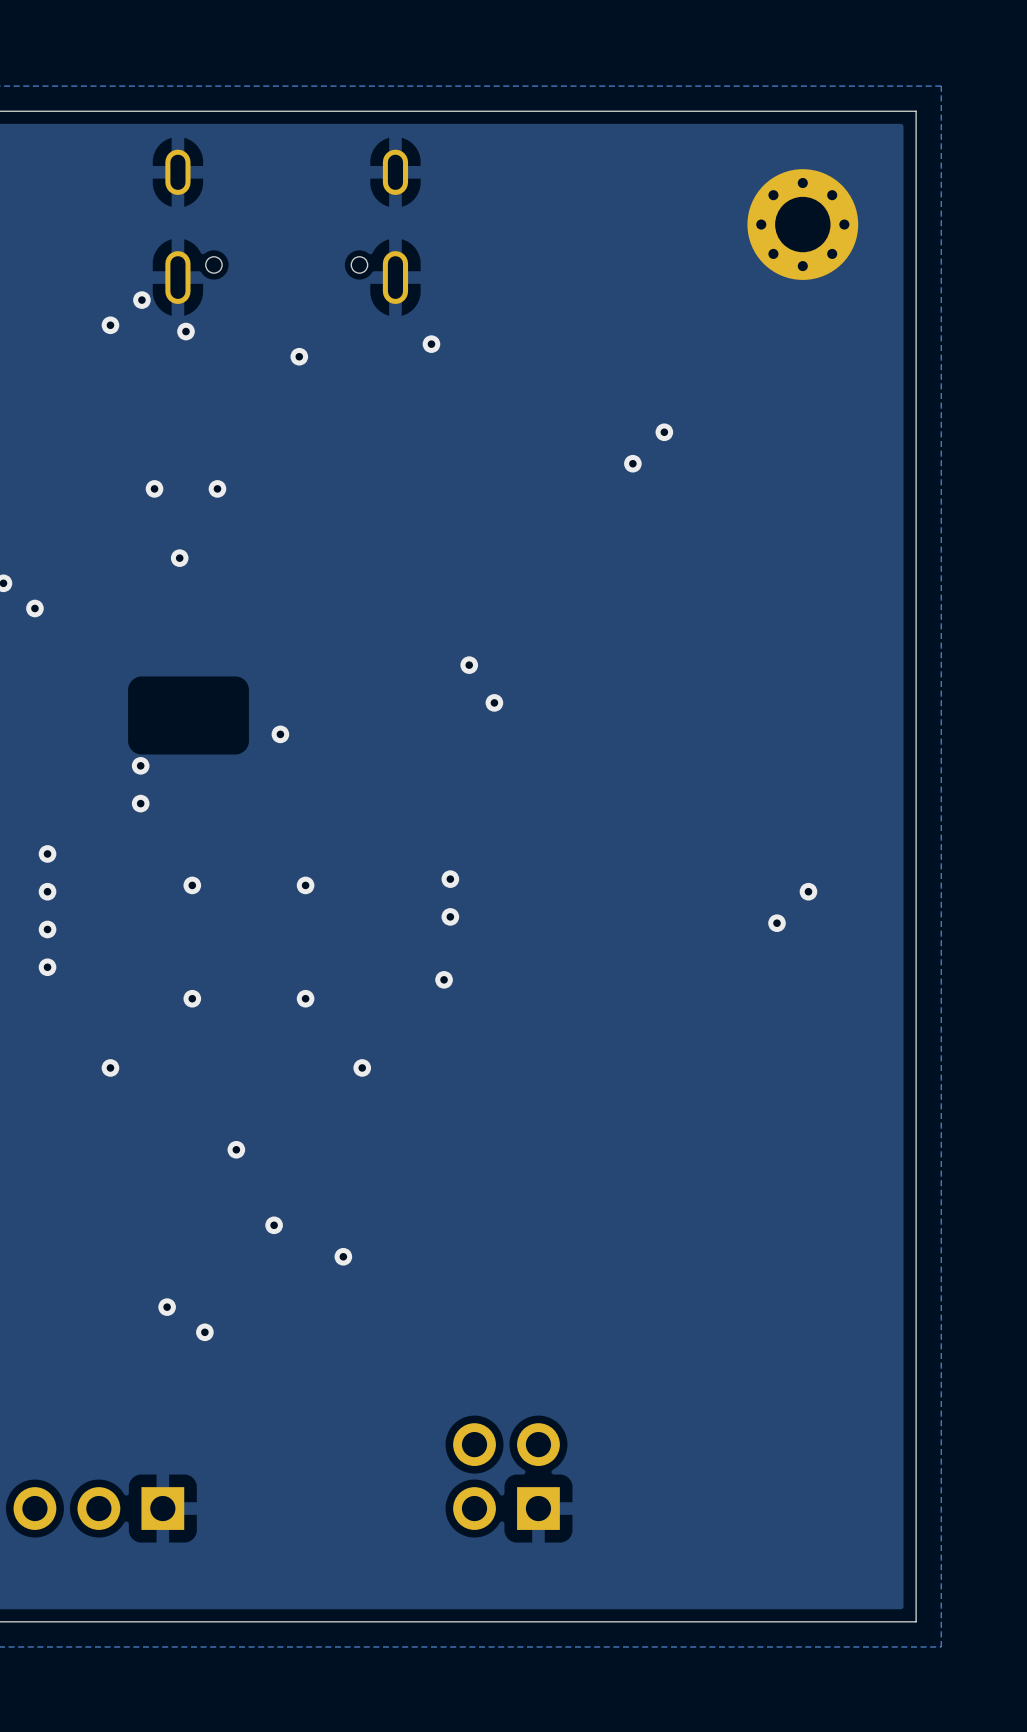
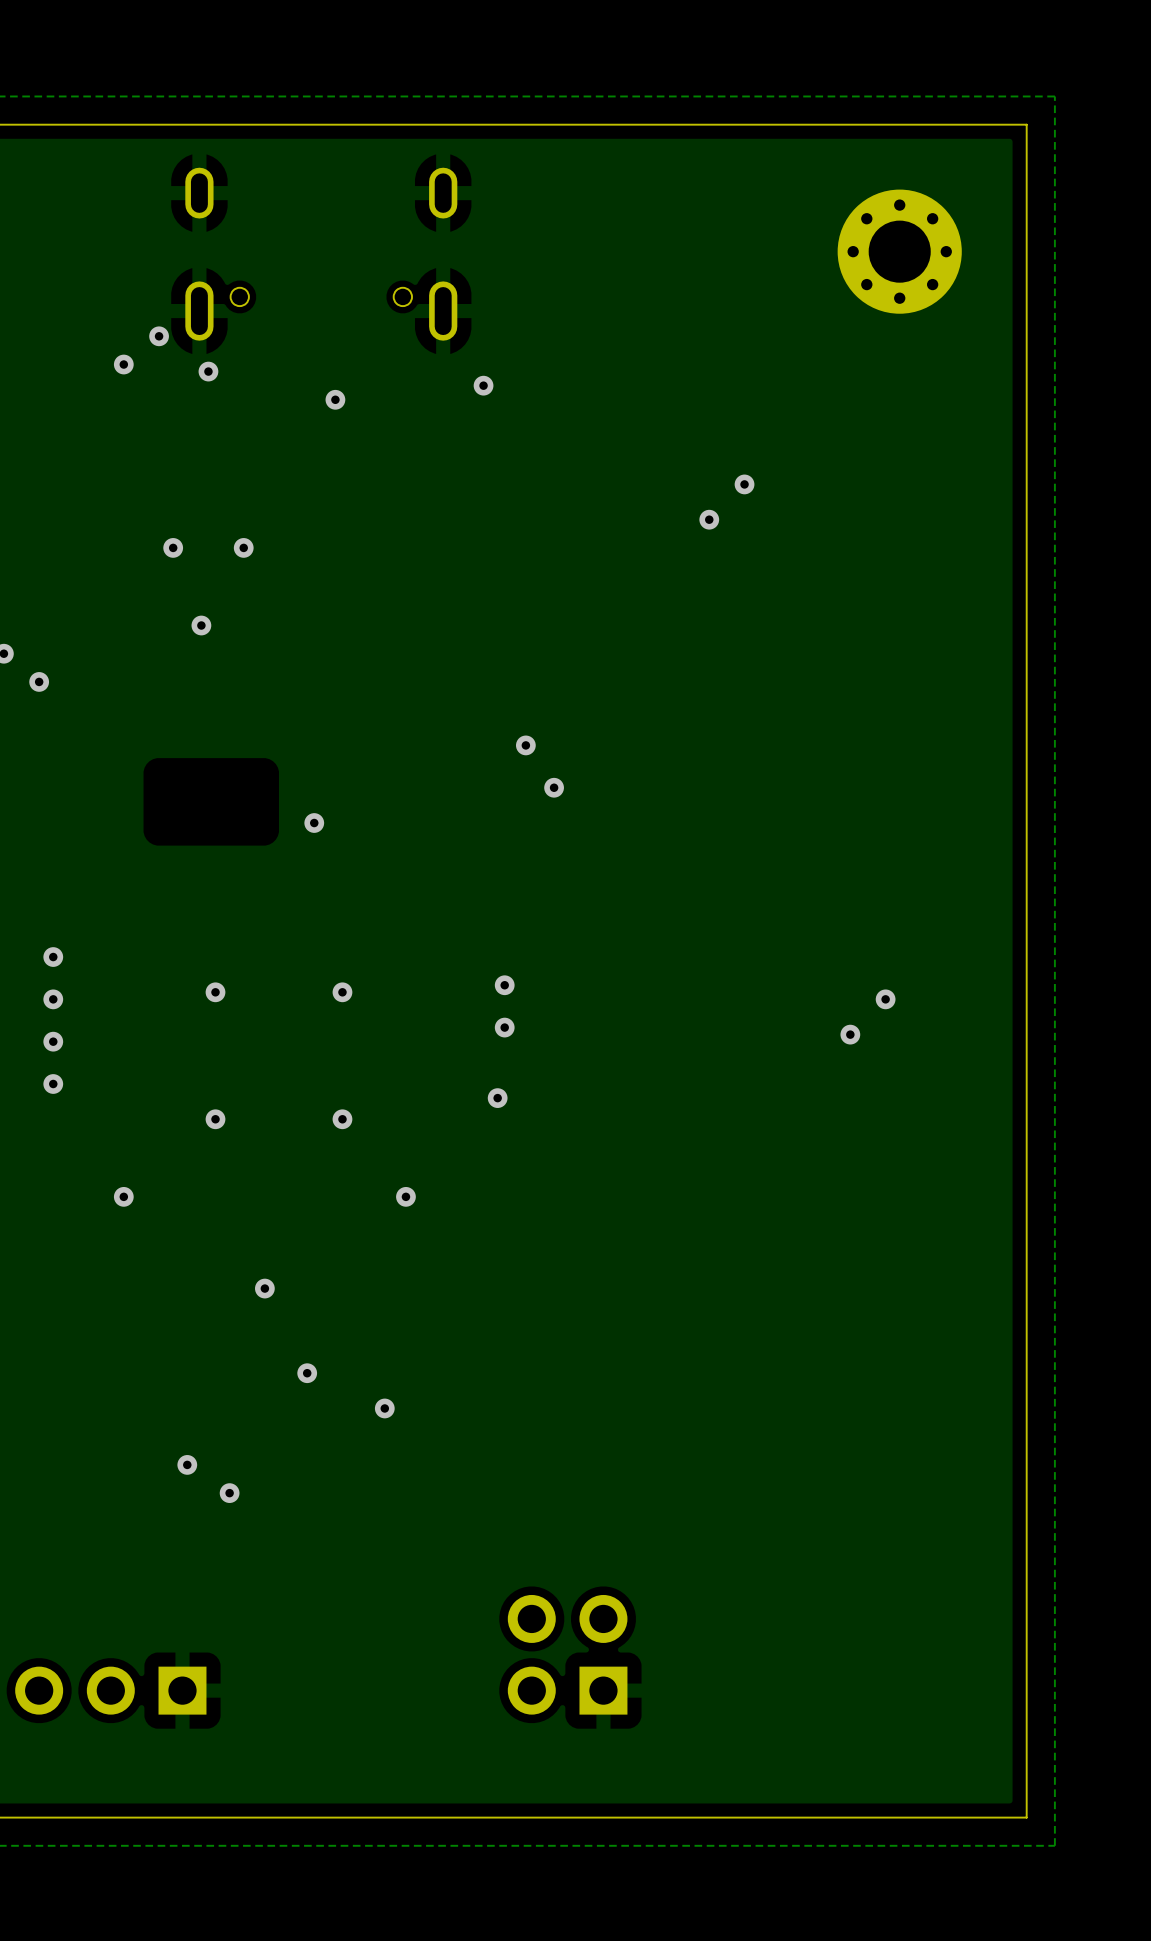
via: (140, 765) -> none
via: (140, 803) -> none
via: none -> (885, 999)
via: (808, 891) -> none
via: none -> (850, 1034)
via: (777, 923) -> none

